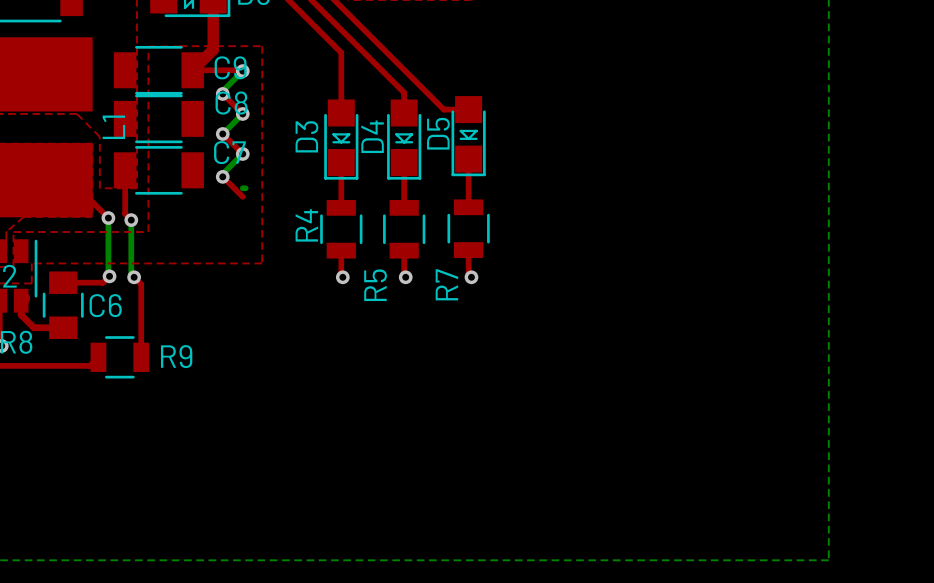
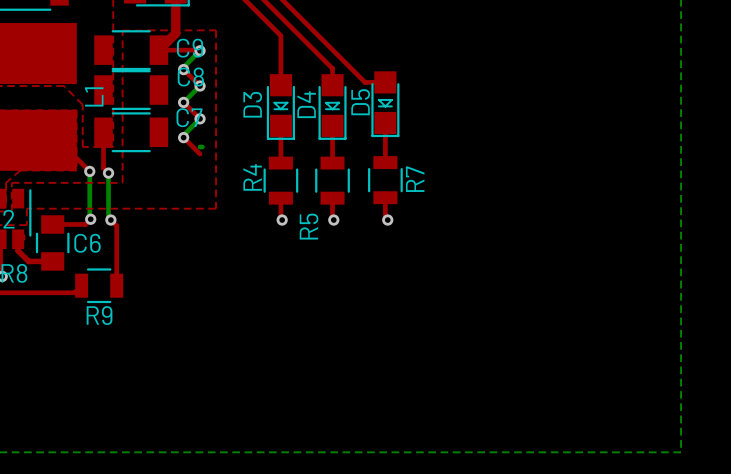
R7 name position: R7 (446, 284) -> R7 (415, 179)
R9 name position: R9 (176, 356) -> R9 (99, 315)

